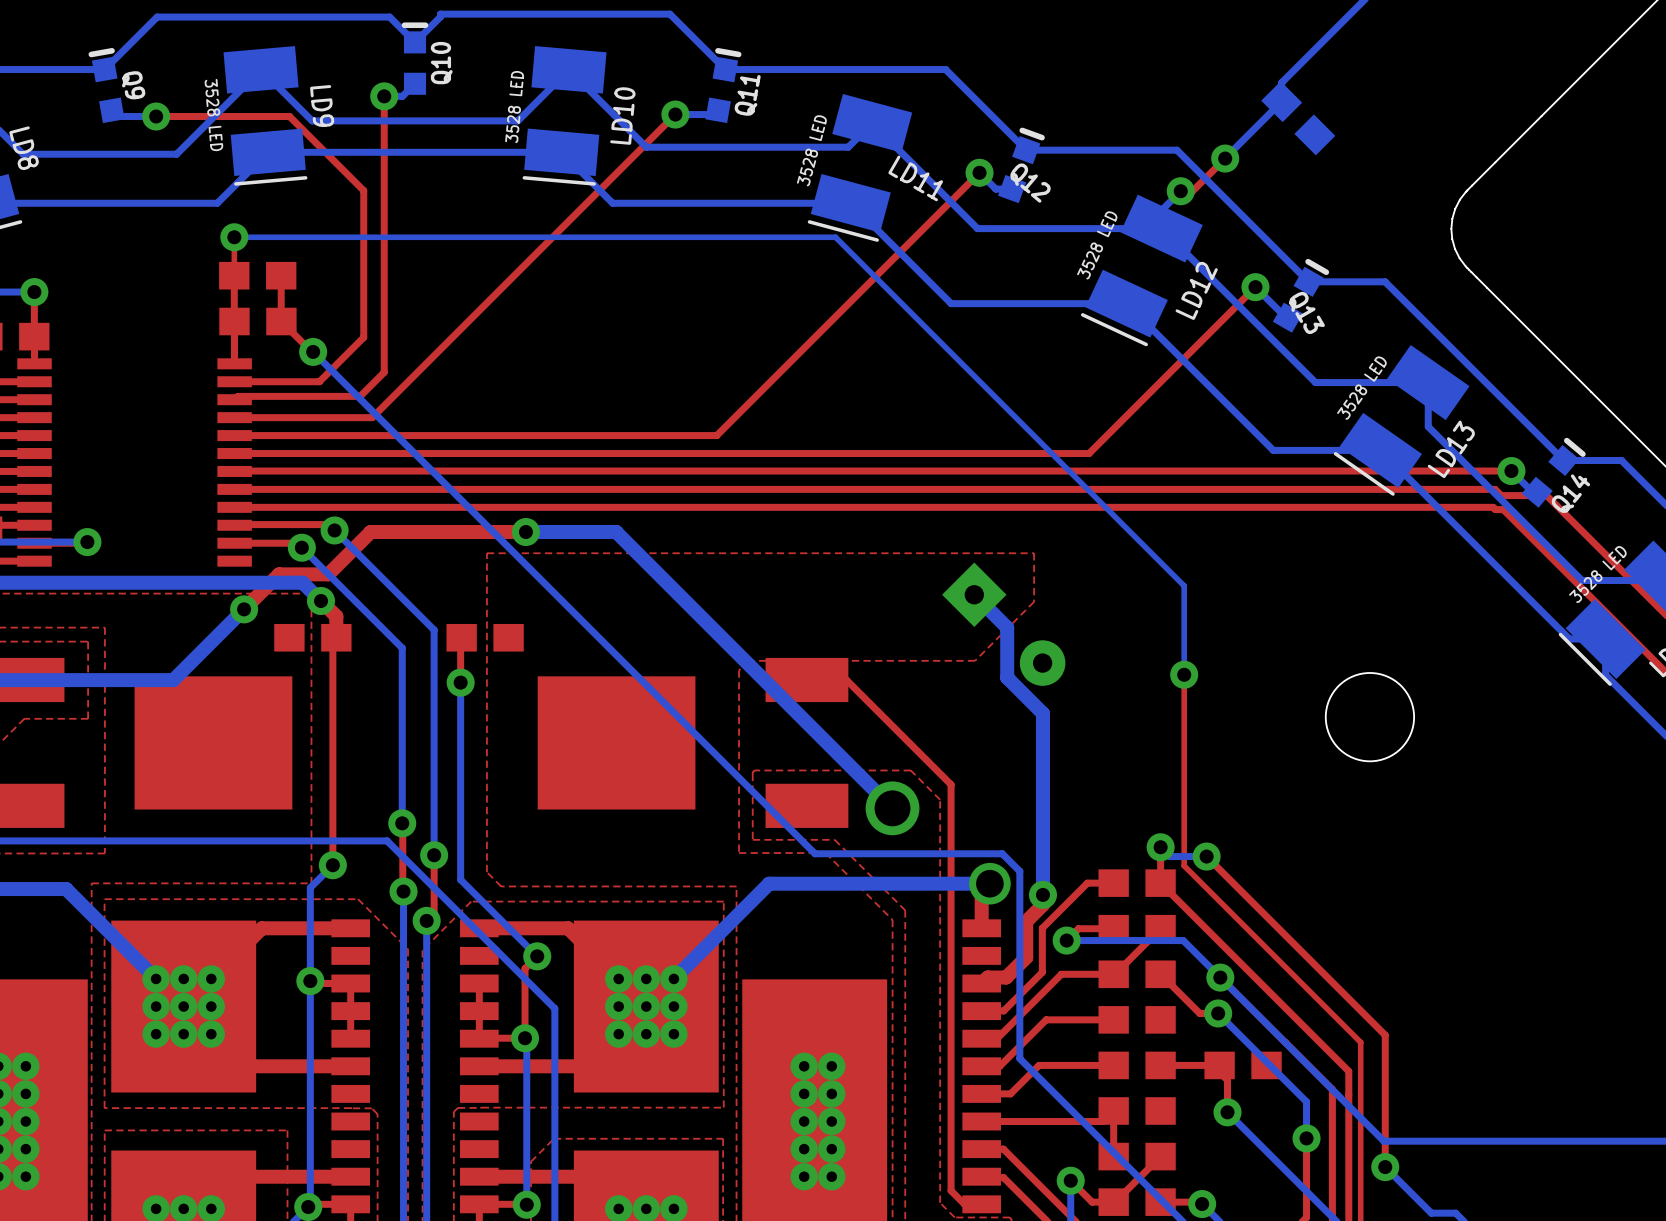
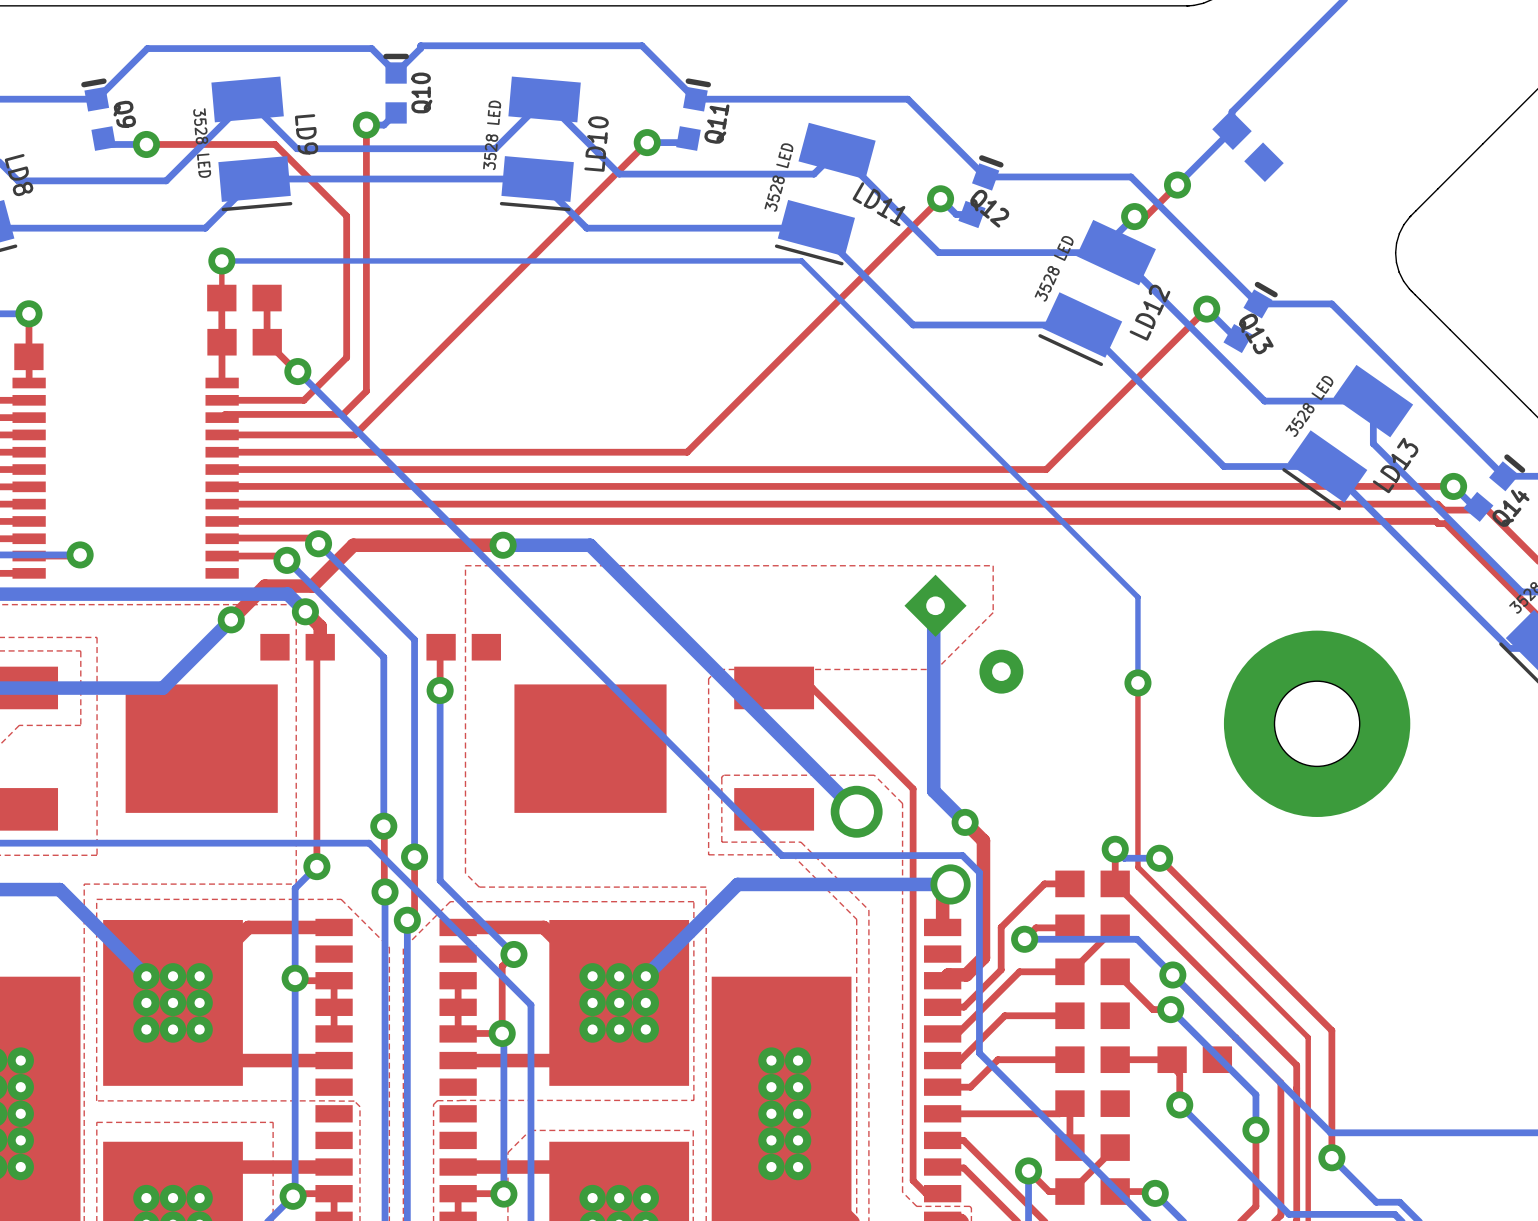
bottom track: (974, 594) (1007, 627) (1007, 677) (1042, 713) (1042, 894) -> (935, 605) (933, 607) (933, 790) (965, 822)
via: none -> (1317, 723)
top track: (1042, 894) (1042, 904) (1026, 921) (1026, 957) (1024, 959) -> (965, 822) (983, 840) (983, 957)
via position: (1042, 894) -> (965, 822)

